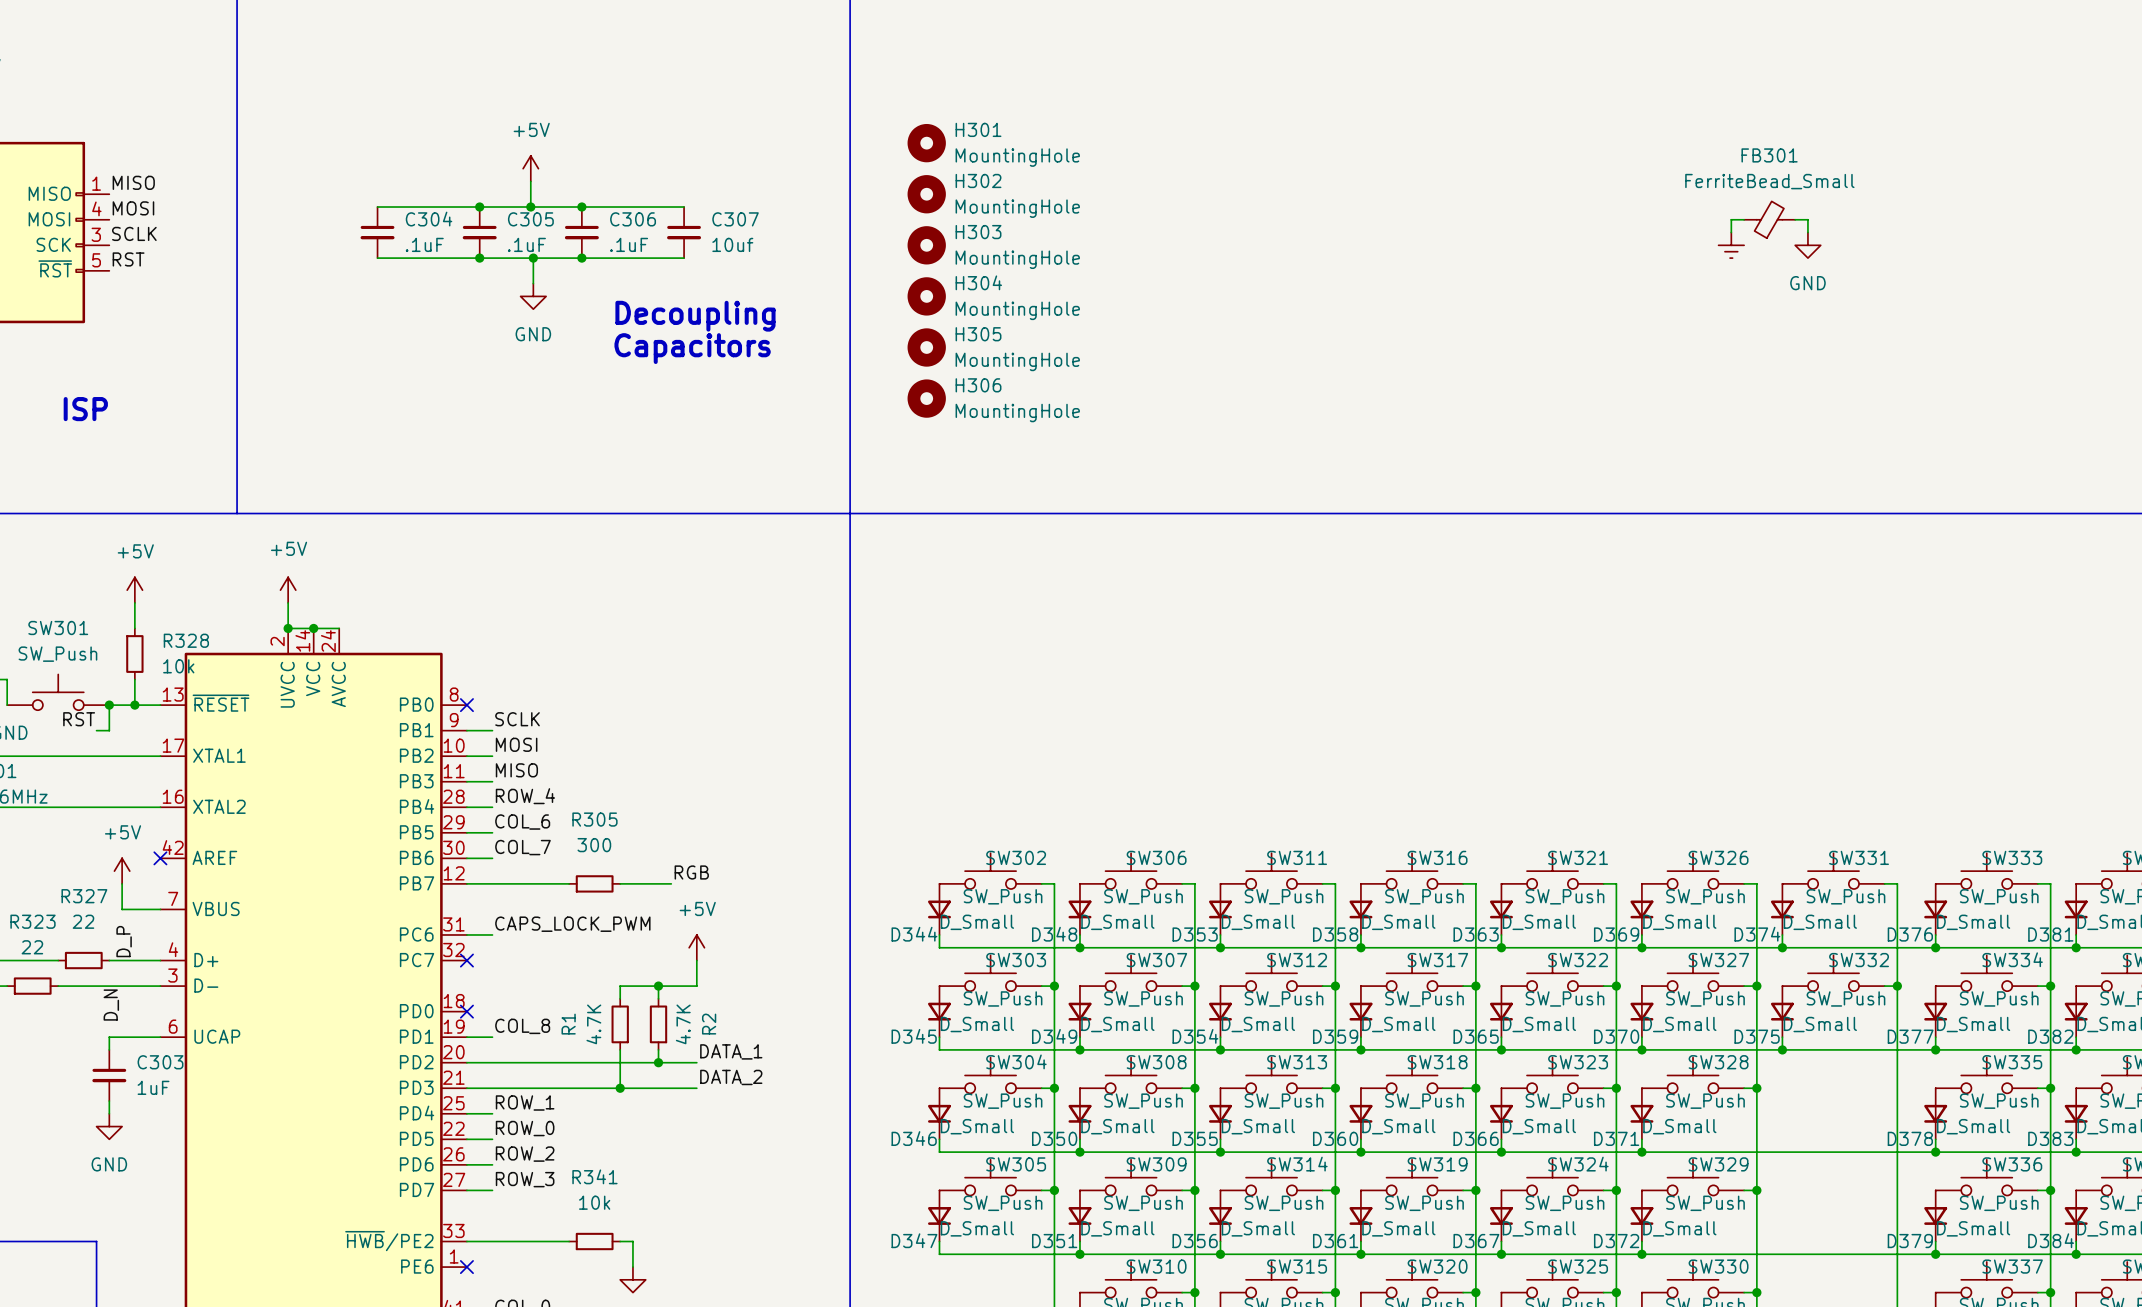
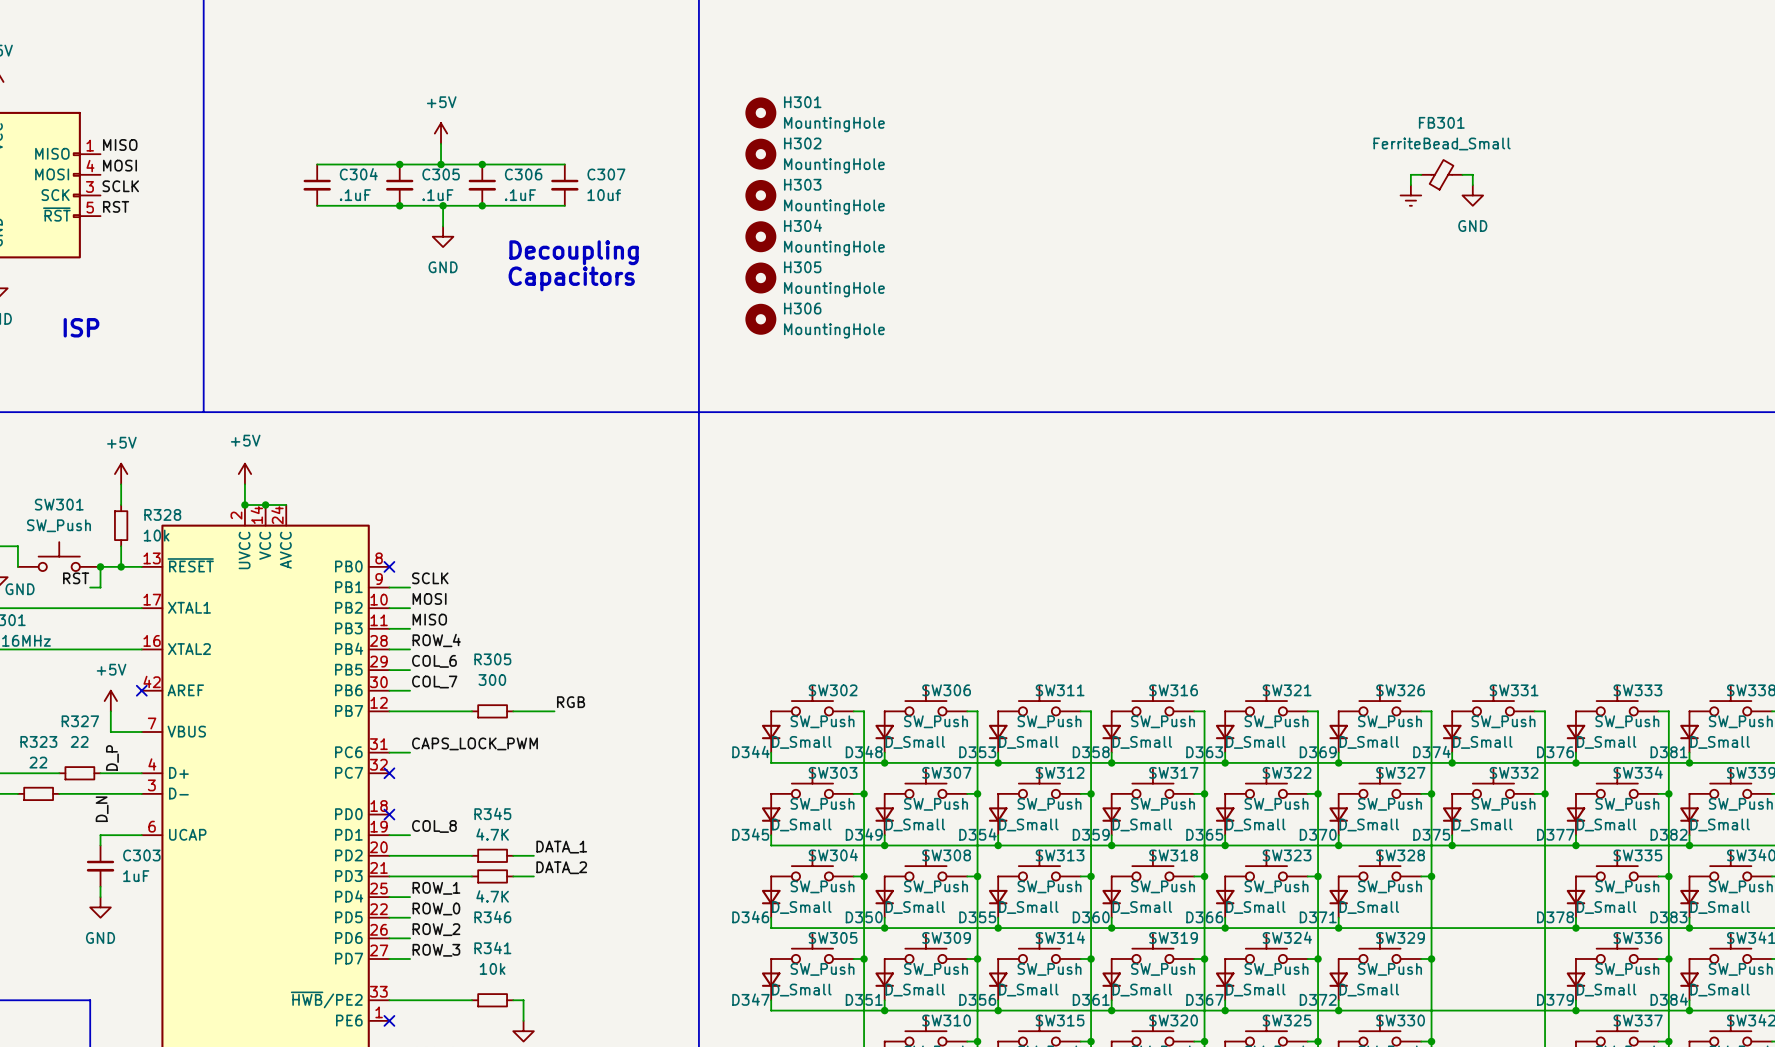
power symbol: +5V (696, 947) -> none
wire: (696, 960) (696, 986) (620, 986) (620, 998) -> none
wire: (658, 986) (658, 998) -> none
junction: (658, 986) -> none
R1: 4.7K (620, 1024) -> none
R2: 4.7K (658, 1024) -> none
wire: (620, 1049) (620, 1088) (569, 1088) -> none
wire: (658, 1049) (658, 1062) -> none
label position: DATA_1 (731, 1051) -> DATA_1 (561, 847)
wire: (569, 1062) (620, 1062) -> none
R345: none -> 4.7K (492, 855)
wire: (645, 1062) (696, 1062) -> none
junction: (658, 1062) -> none
label position: DATA_2 (731, 1077) -> DATA_2 (561, 867)
R346: none -> 4.7K (492, 876)
junction: (620, 1088) -> none
wire: (645, 1088) (696, 1088) -> none

